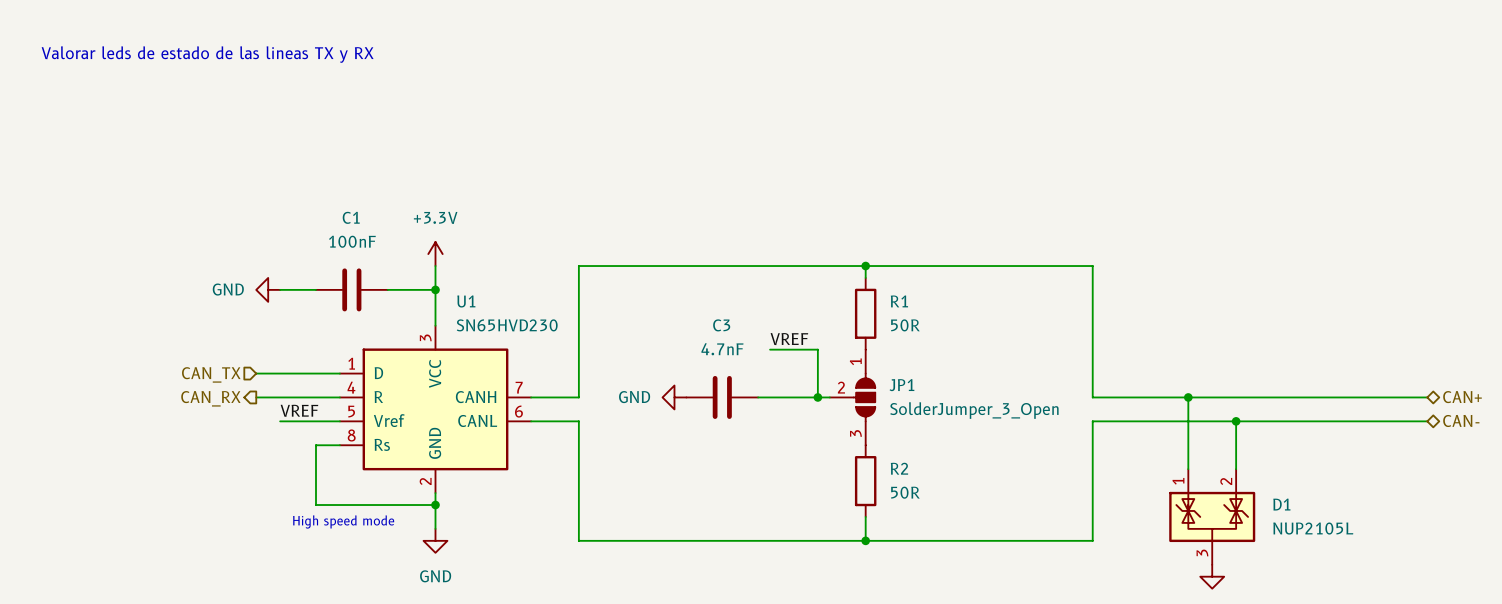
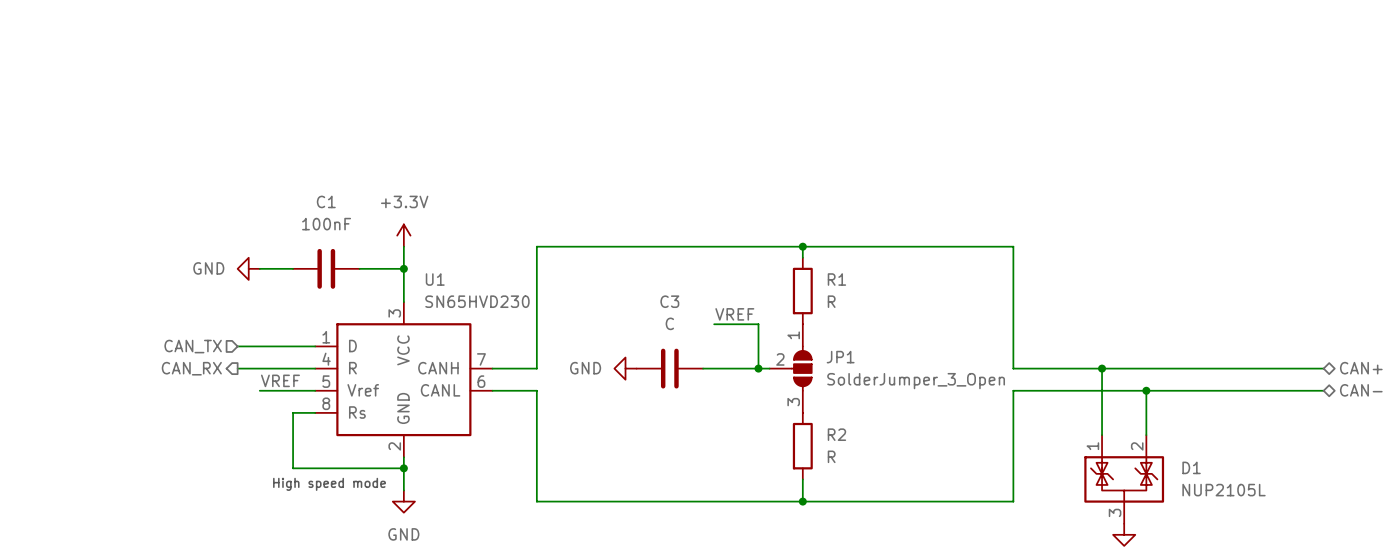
text: Valorar leds de estado de las lineas TX y RX (207, 54) -> none
R1 value: 50R (905, 325) -> R (831, 301)
C3 value: 4.7nF (722, 349) -> C (669, 323)
R2 value: 50R (905, 492) -> R (831, 456)

